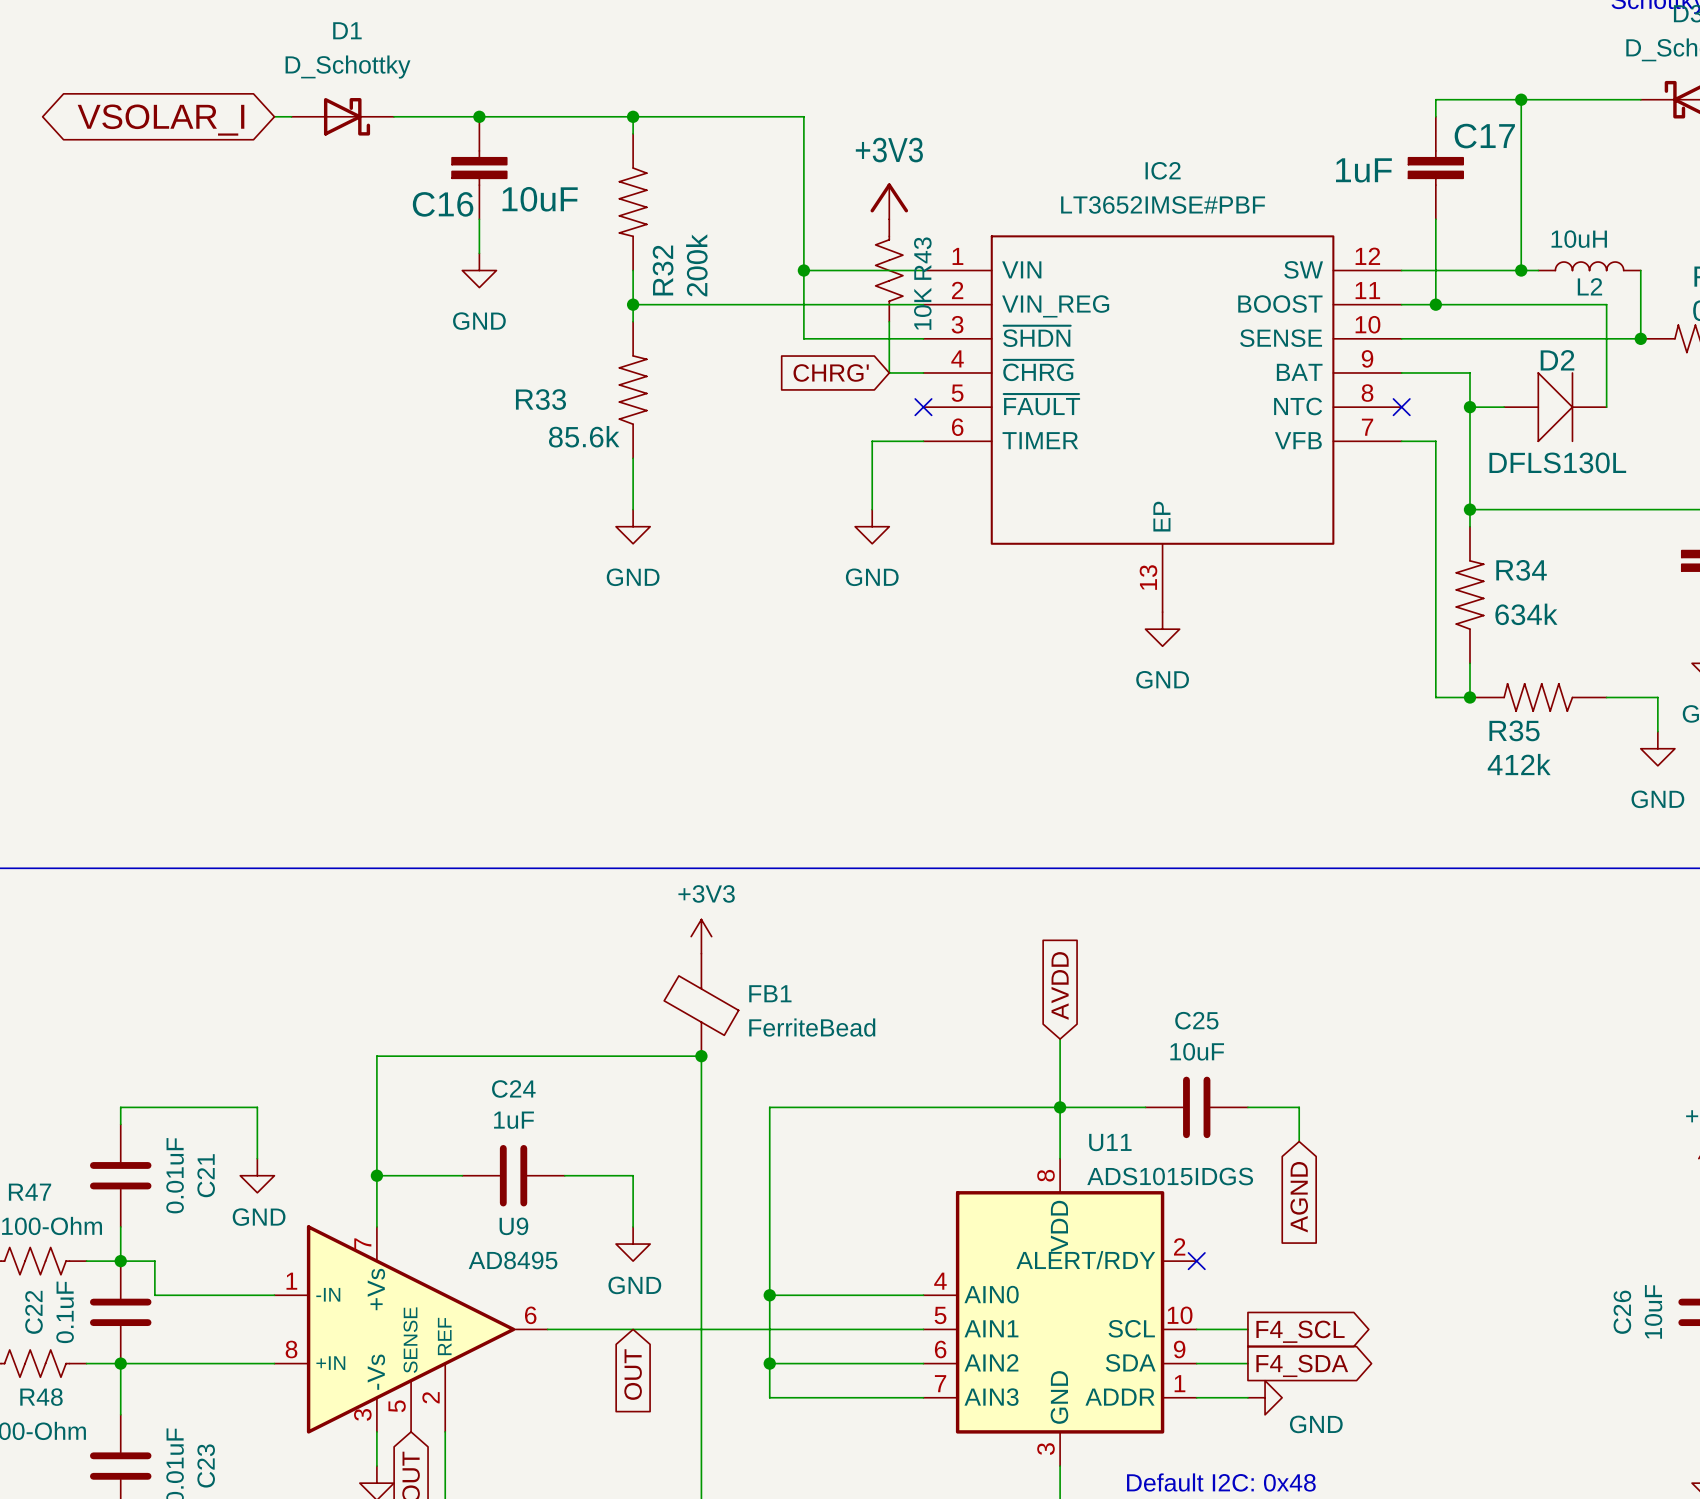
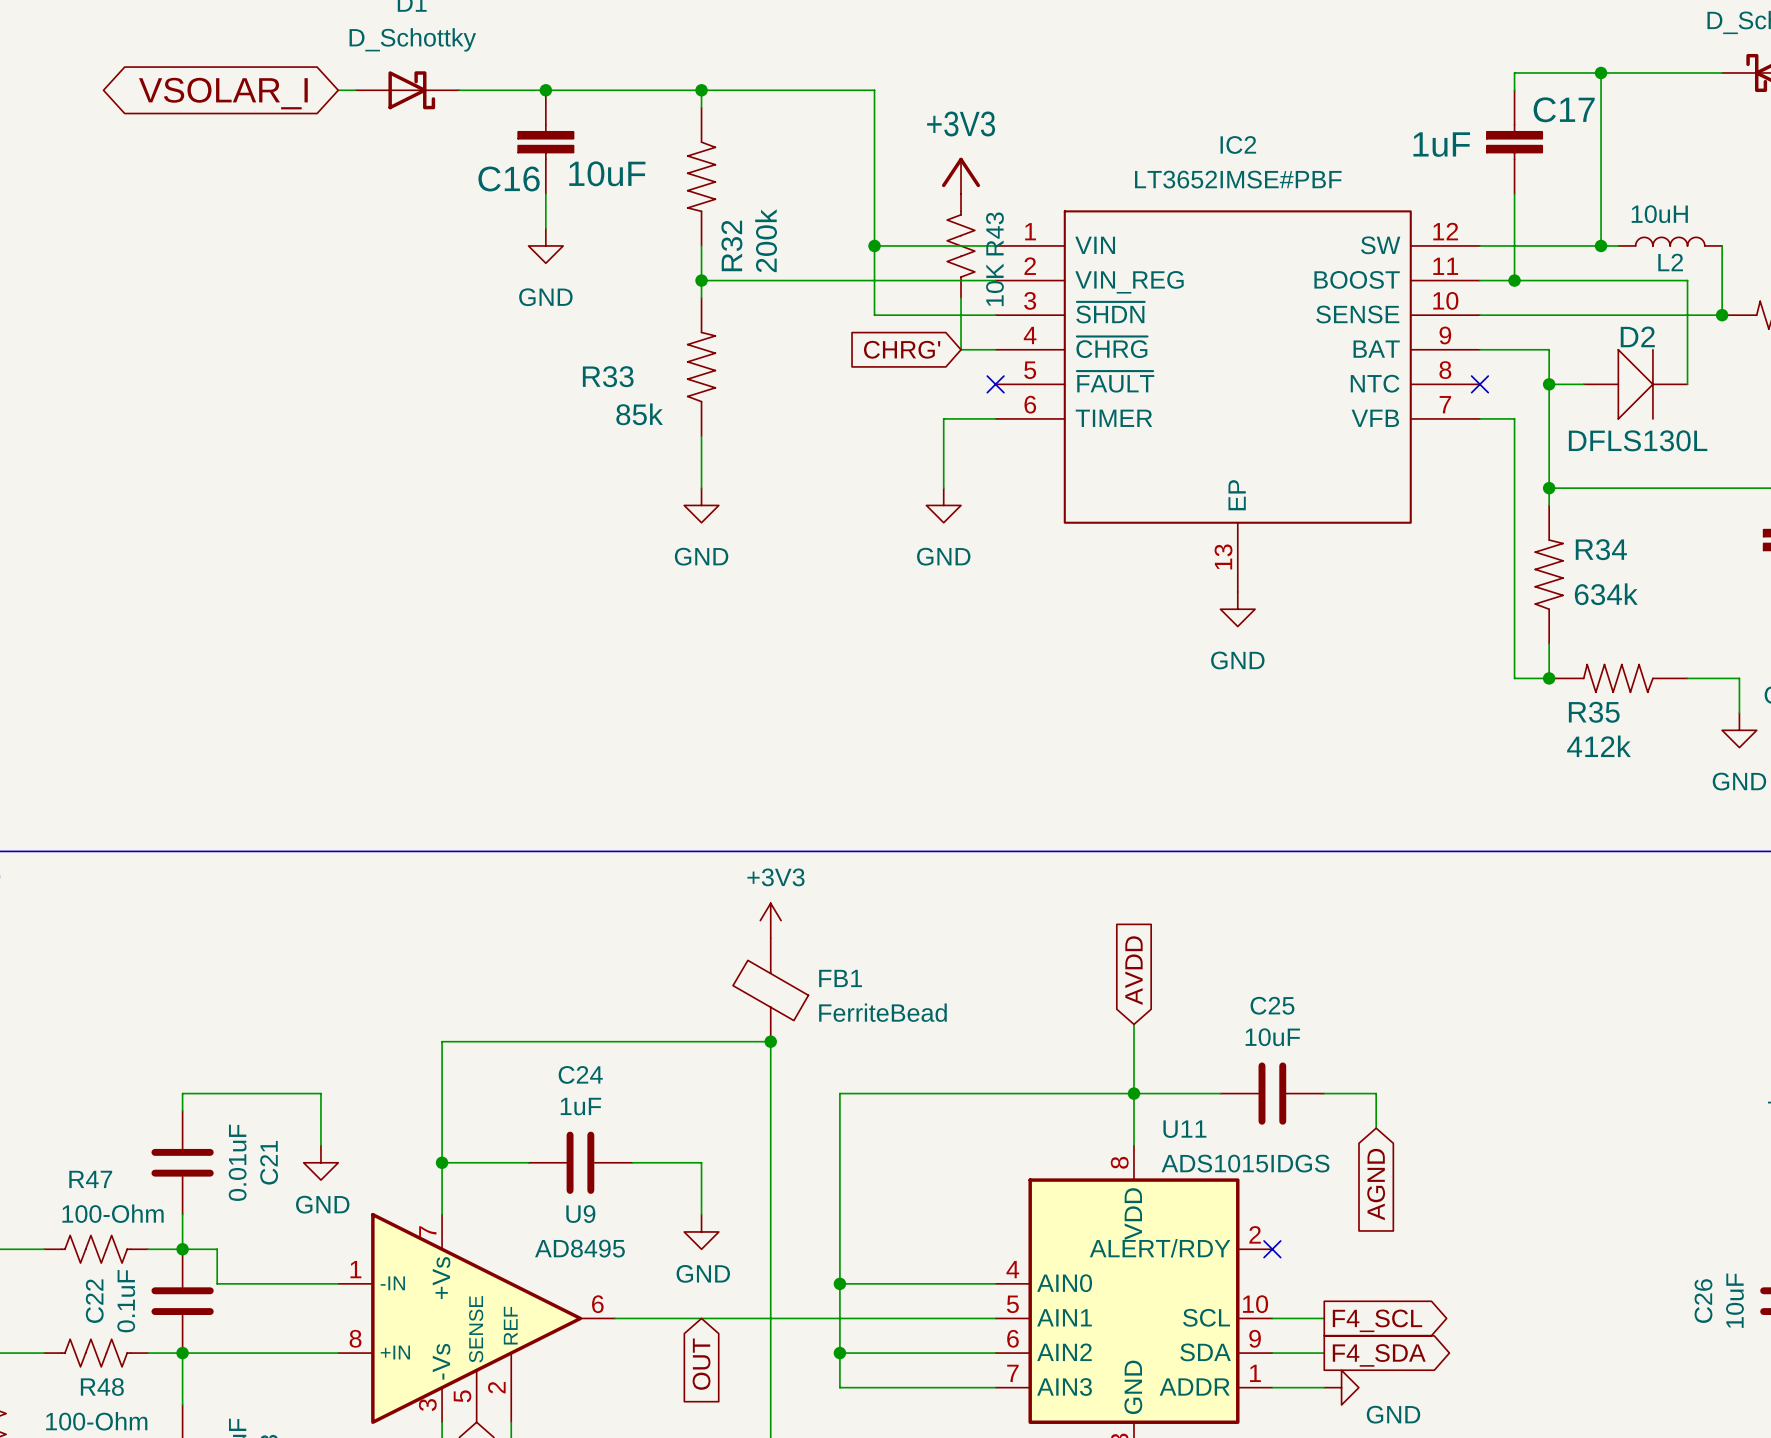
R33 value: 85.6k (584, 436) -> 85k (639, 414)

